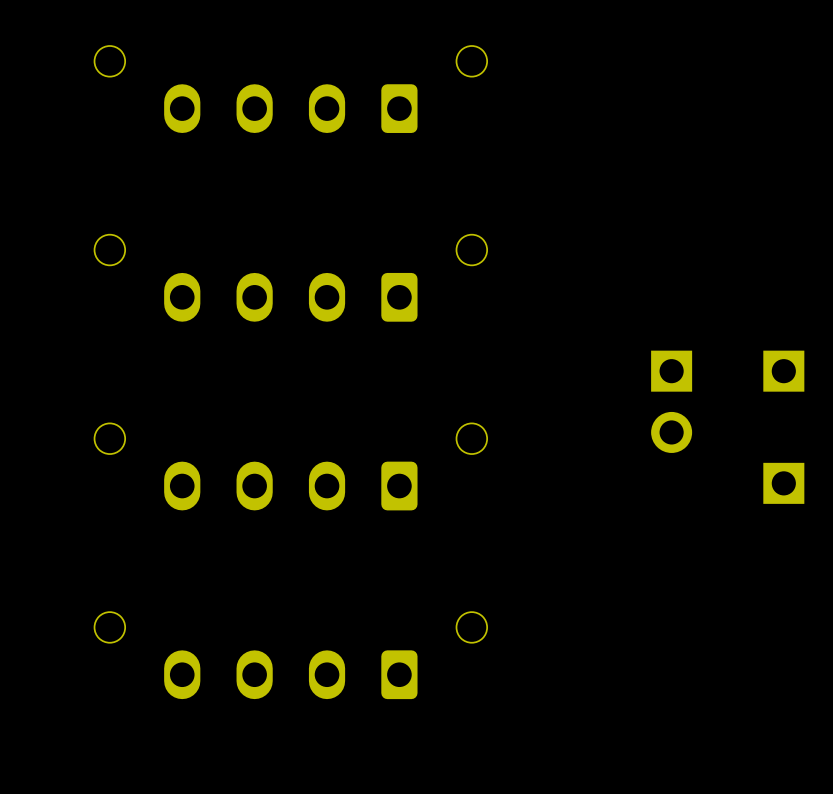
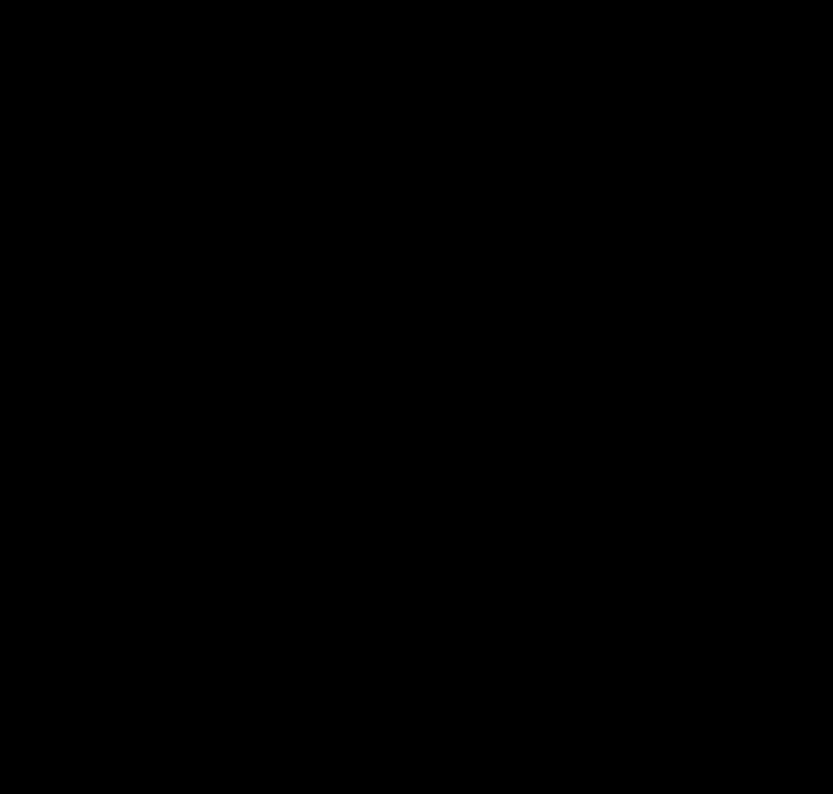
part: (290, 89) -> none
part: (290, 278) -> none
part: (783, 371) -> none
part: (671, 401) -> none
part: (290, 466) -> none
part: (783, 483) -> none
part: (290, 655) -> none

